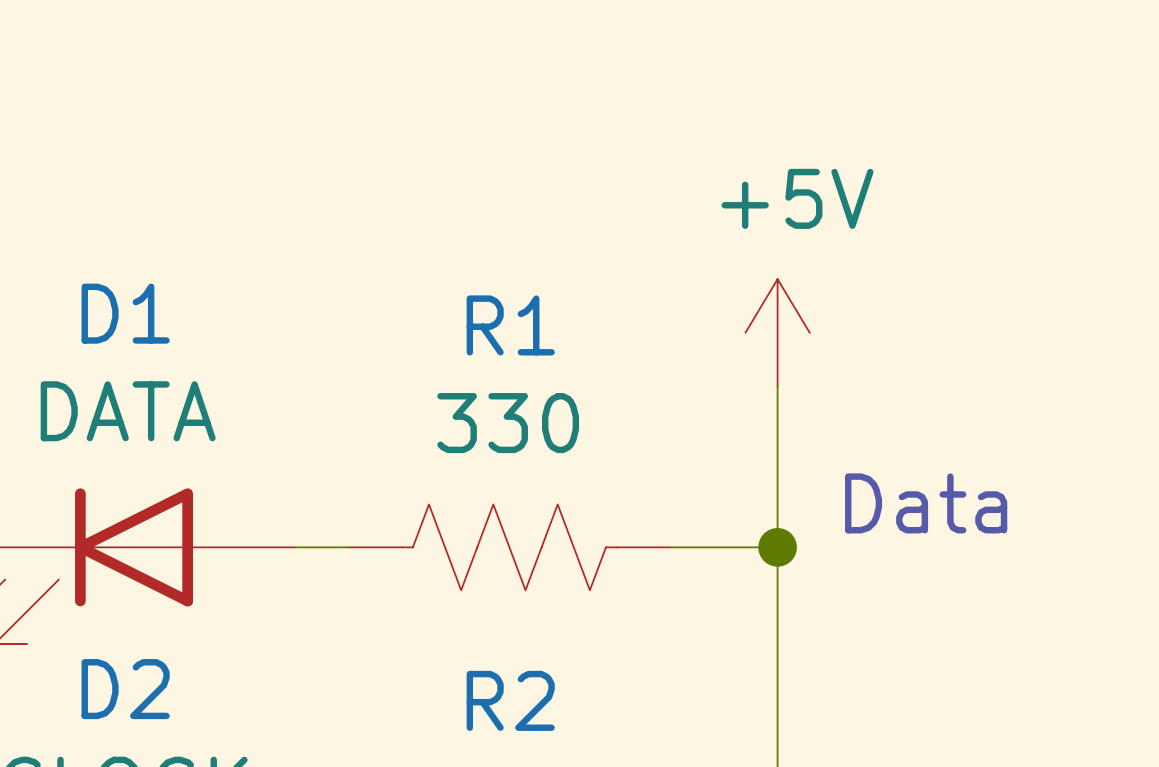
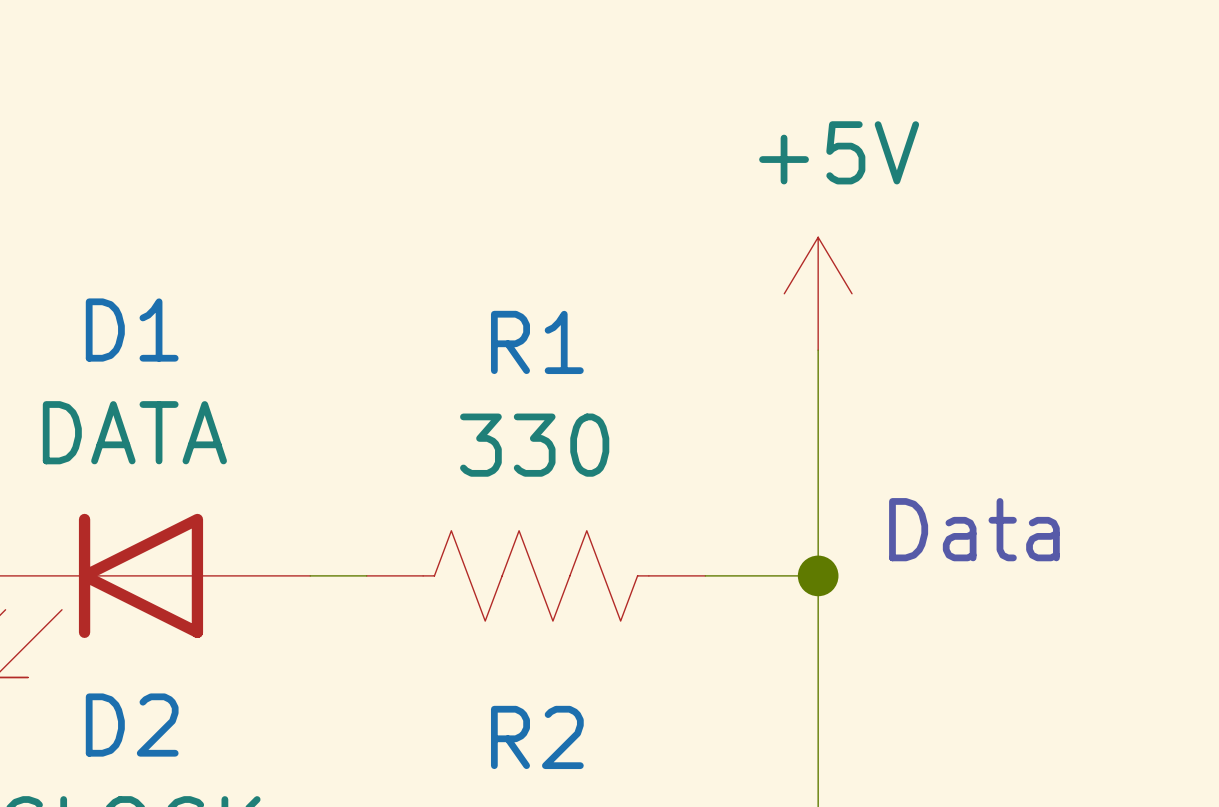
power symbol position: +5V (777, 332) -> +5V (818, 293)

